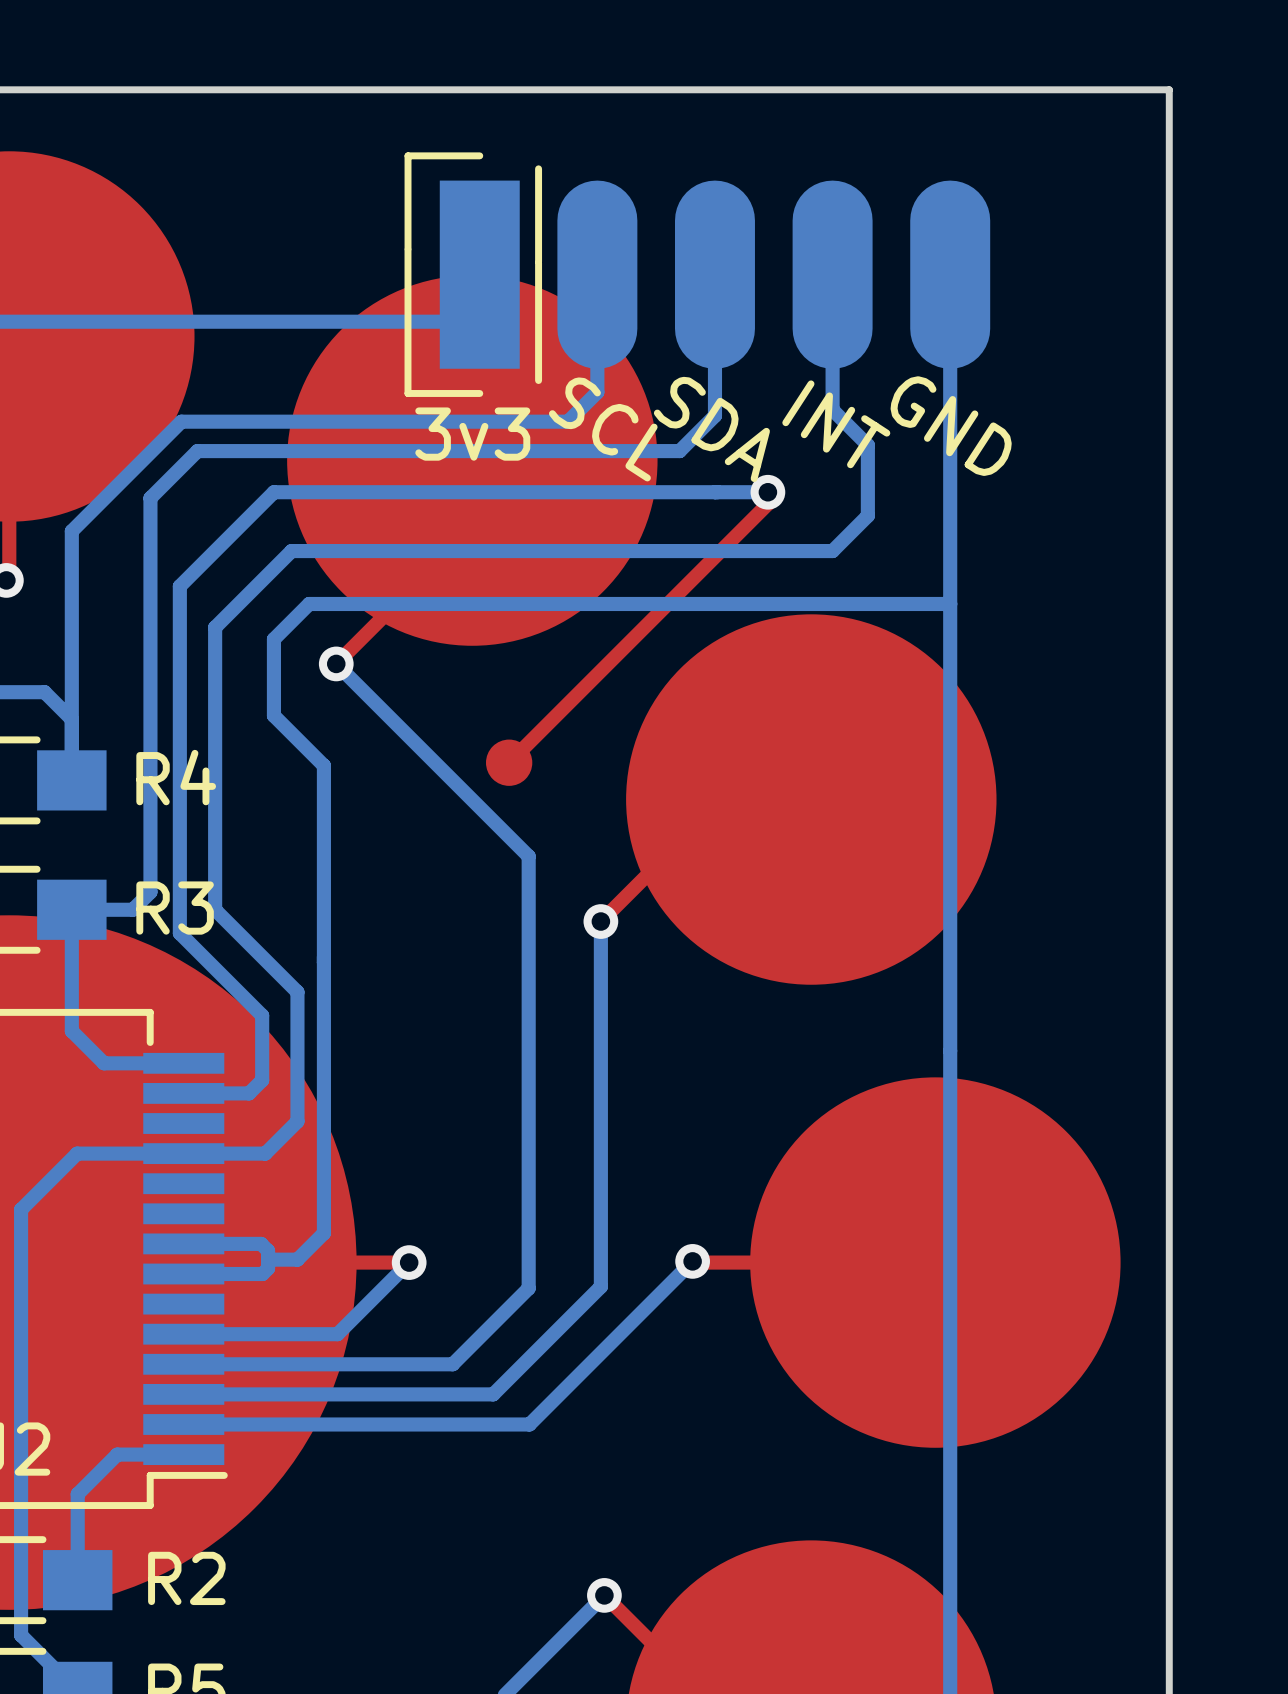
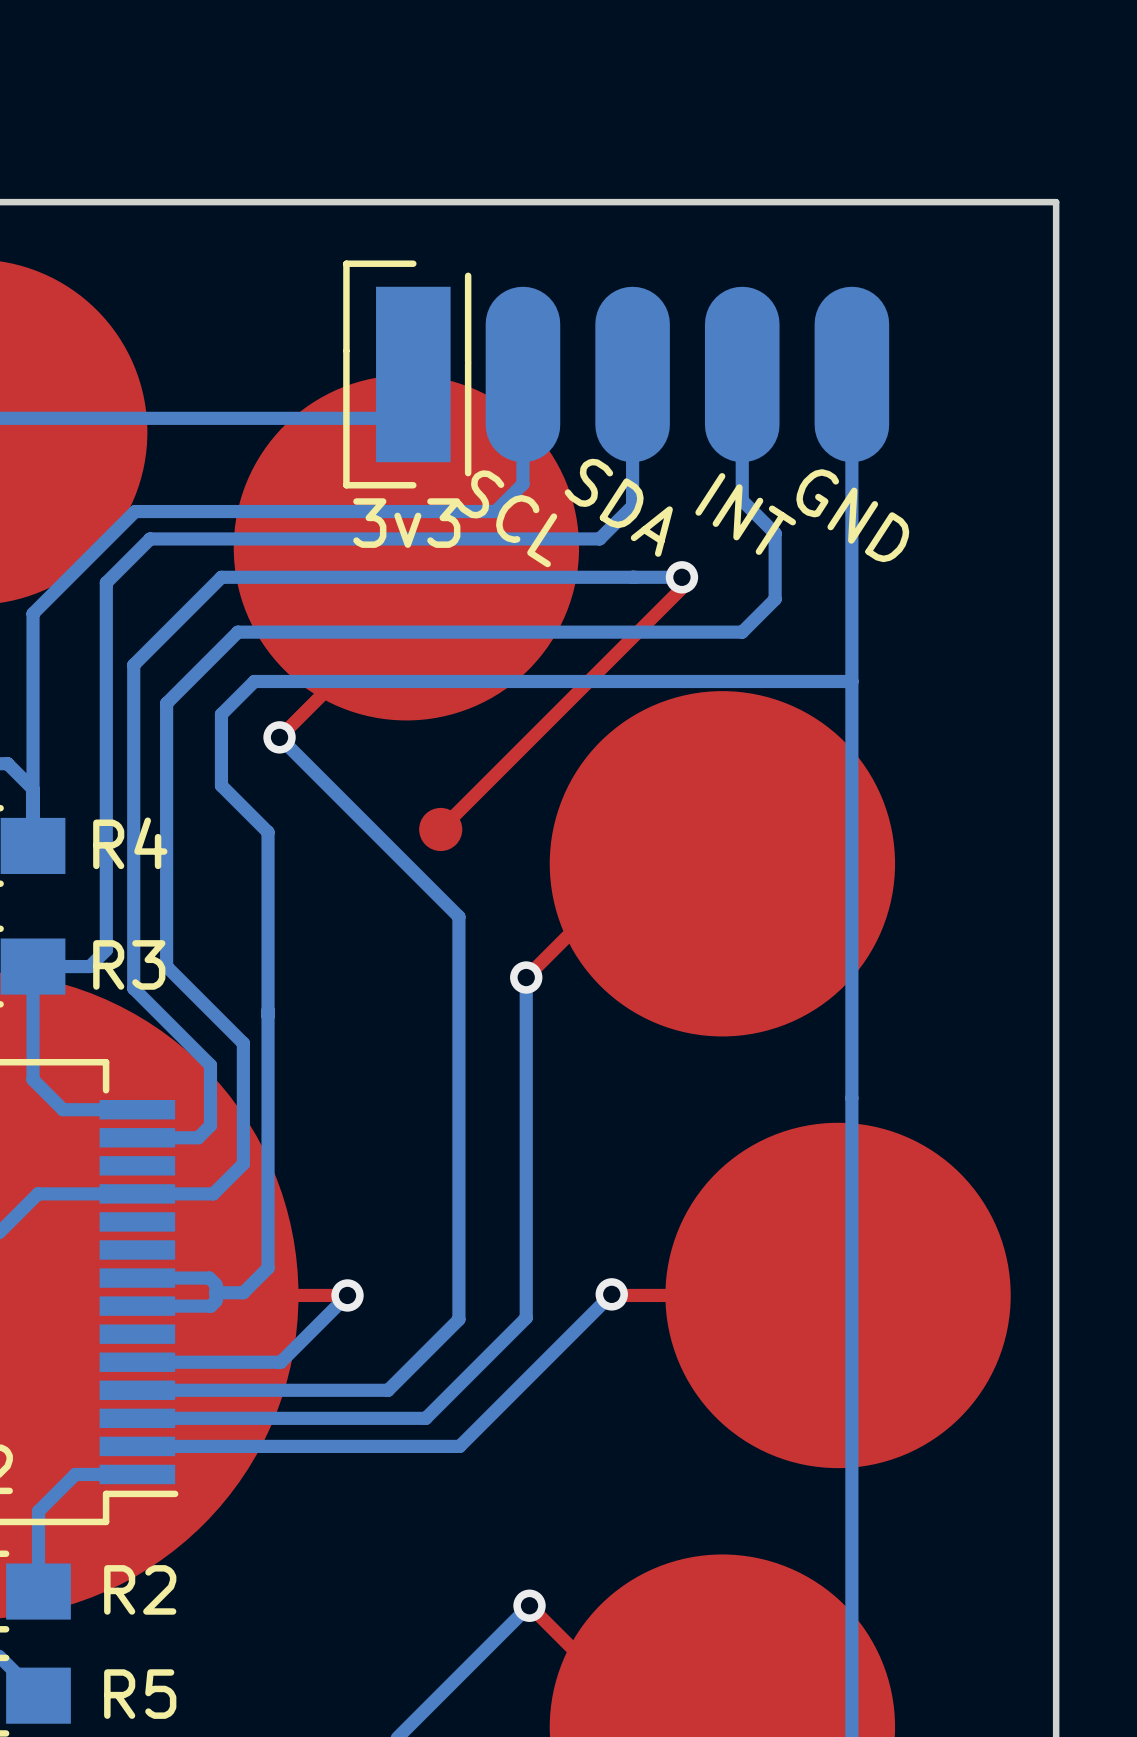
text position: SCL (603, 429) -> SCL (506, 518)
text position: SDA (711, 429) -> SDA (618, 507)

